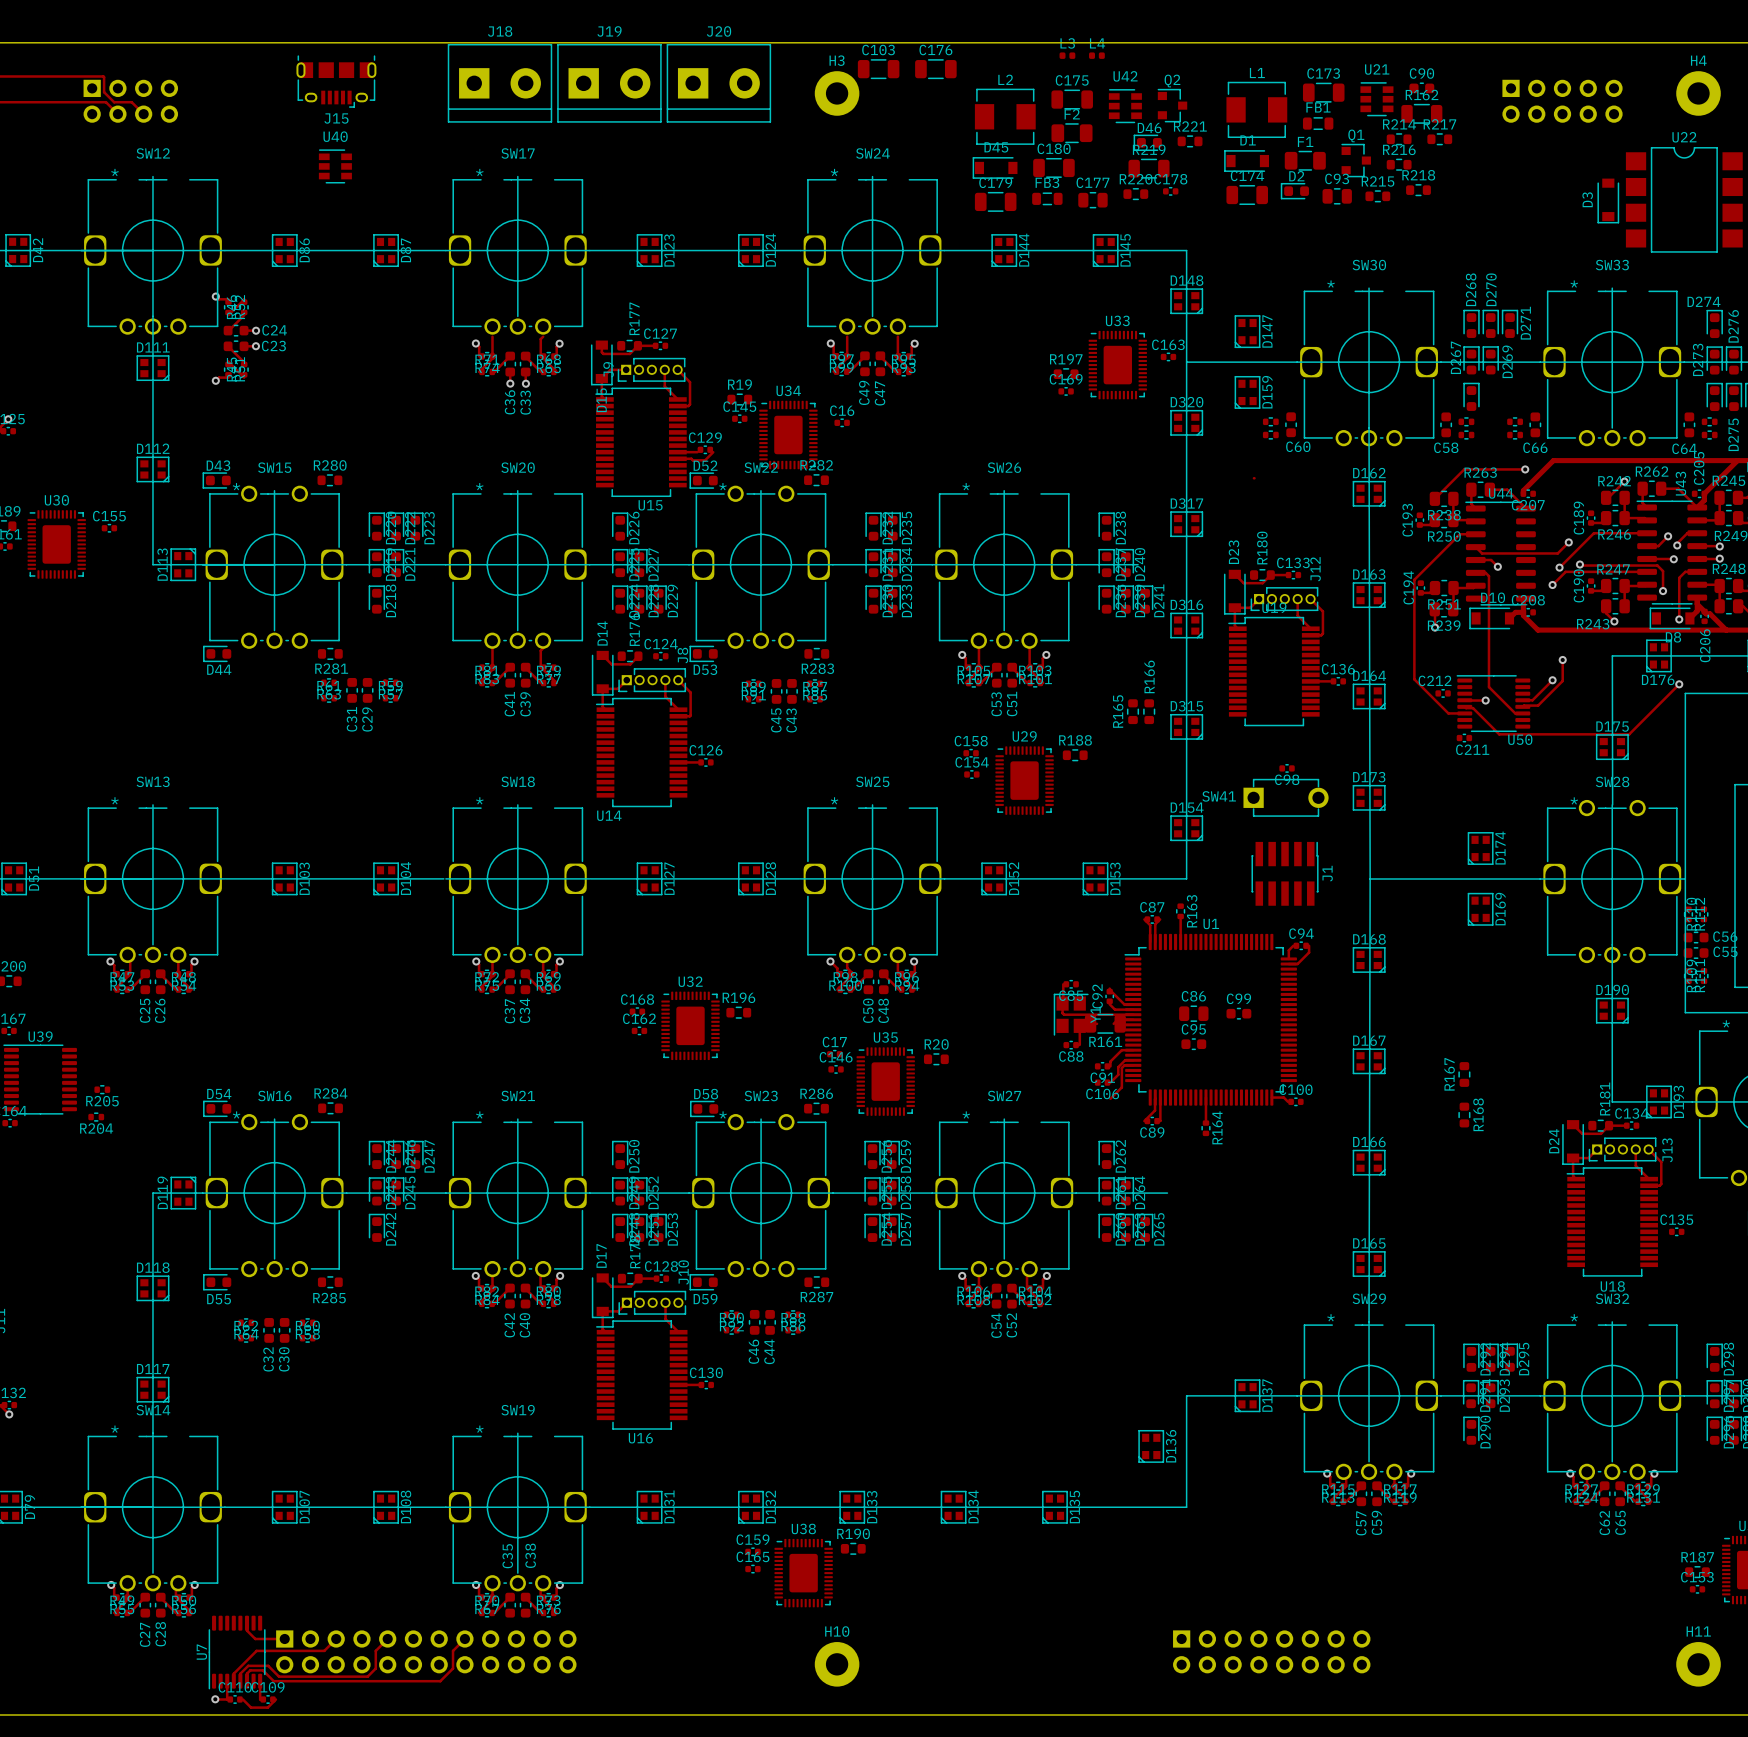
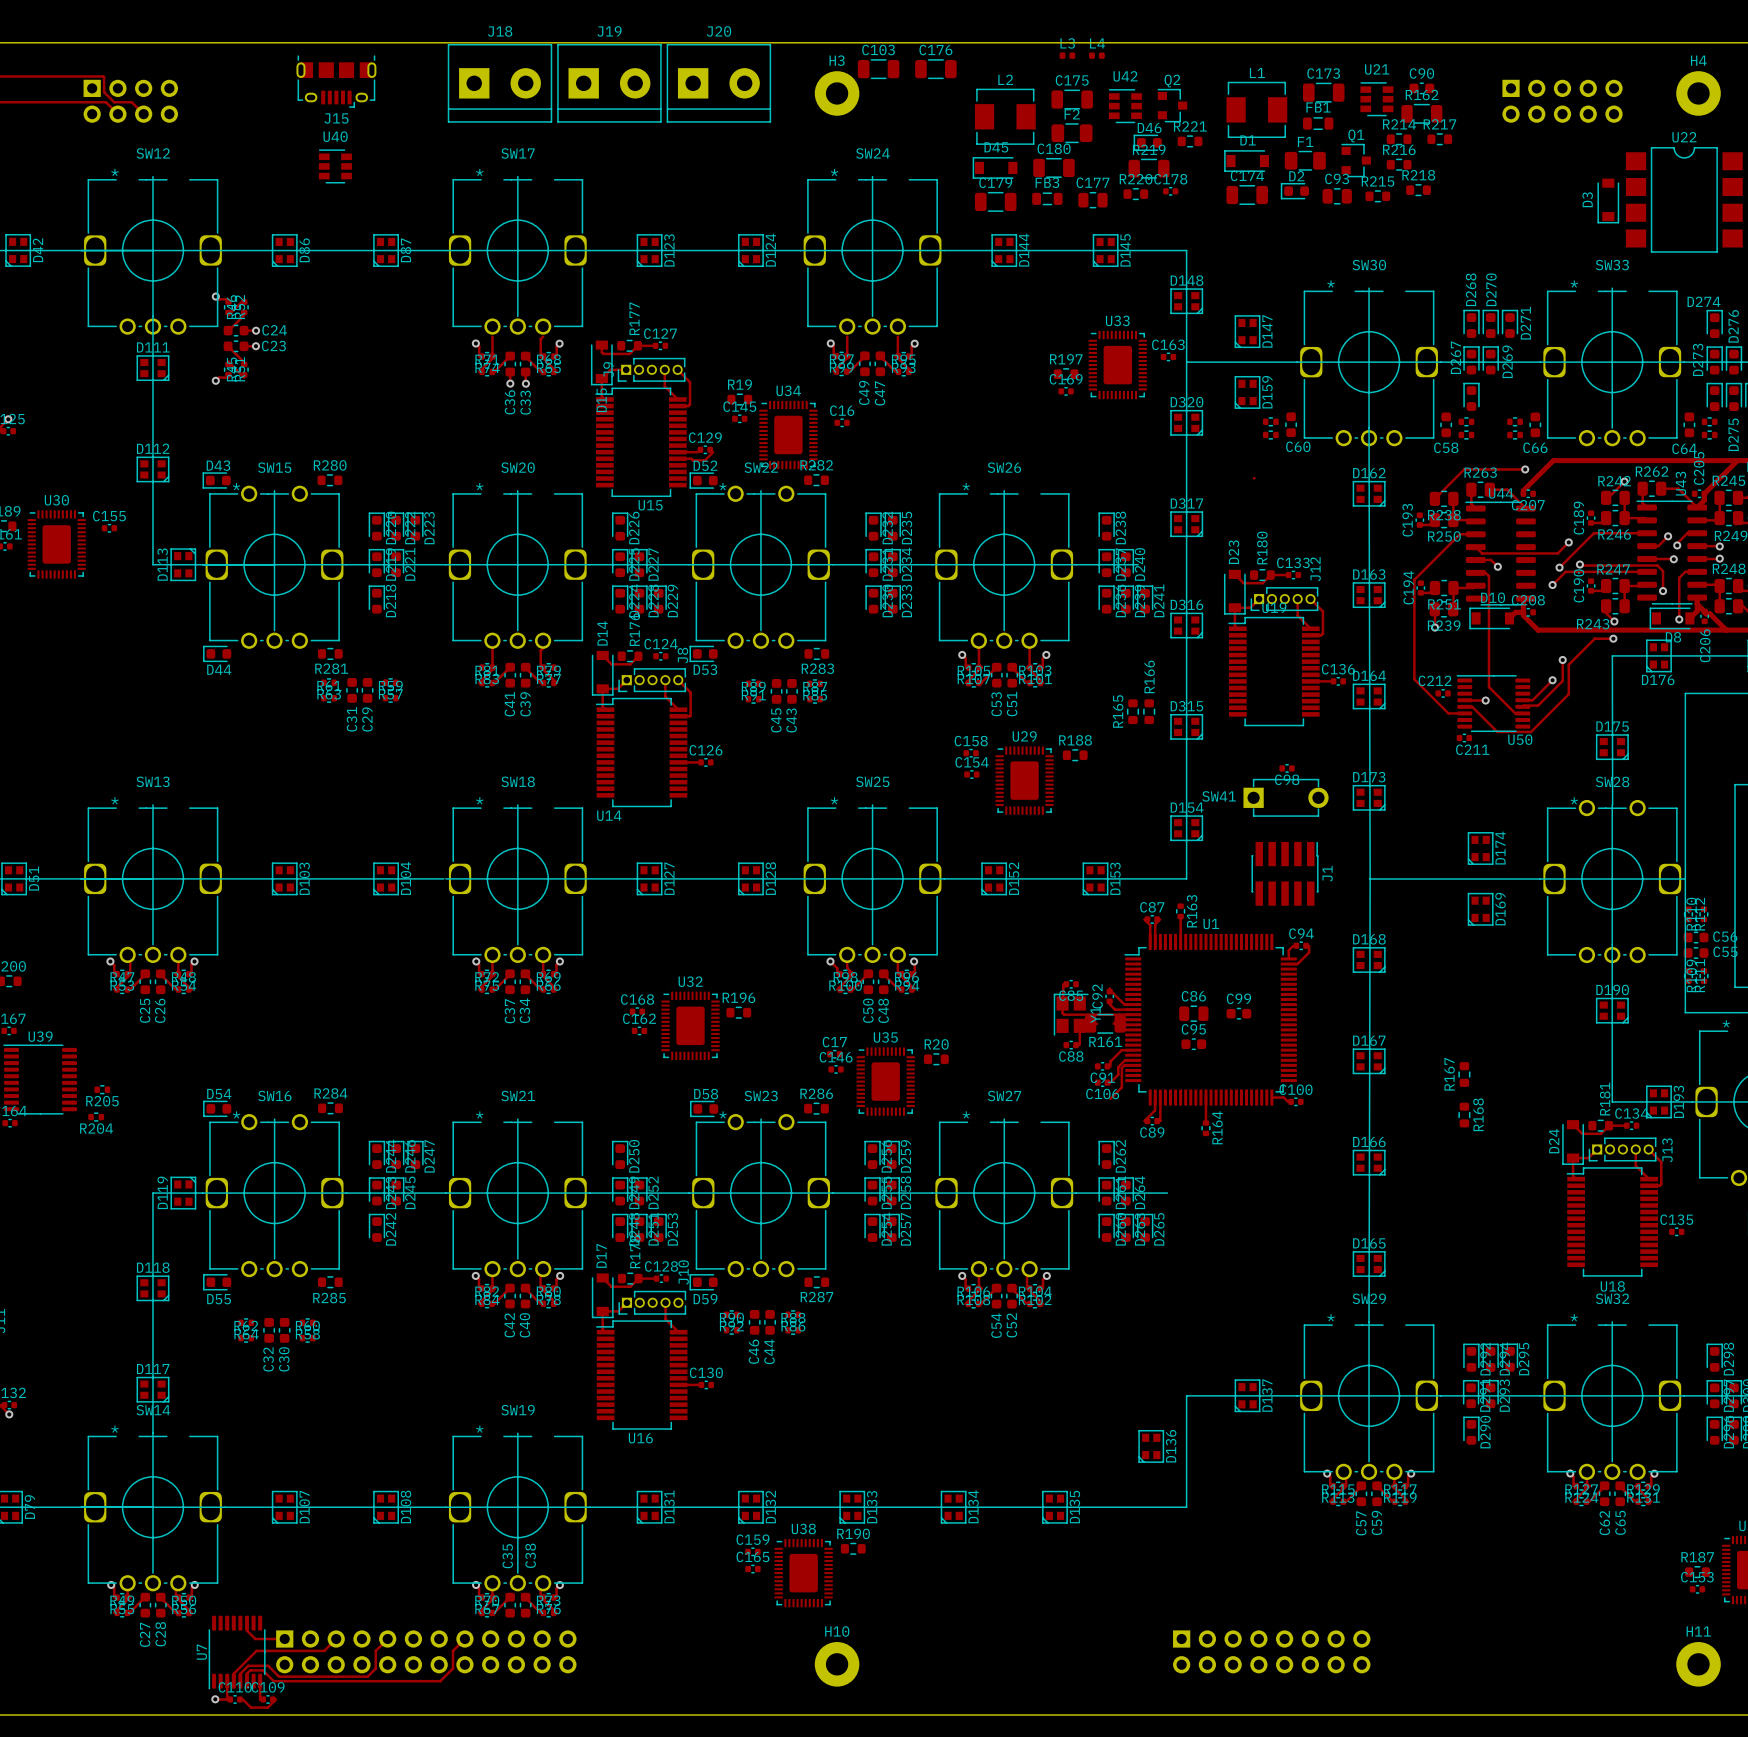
via: none -> (1613, 638)
track: (1679, 684) (1629, 734) (1499, 734) (1473, 708) (1464, 706) -> (1613, 638) (1594, 638) (1568, 664) (1568, 694) (1531, 731) (1497, 731) (1472, 706) (1464, 706)
via: (1679, 684) -> none

